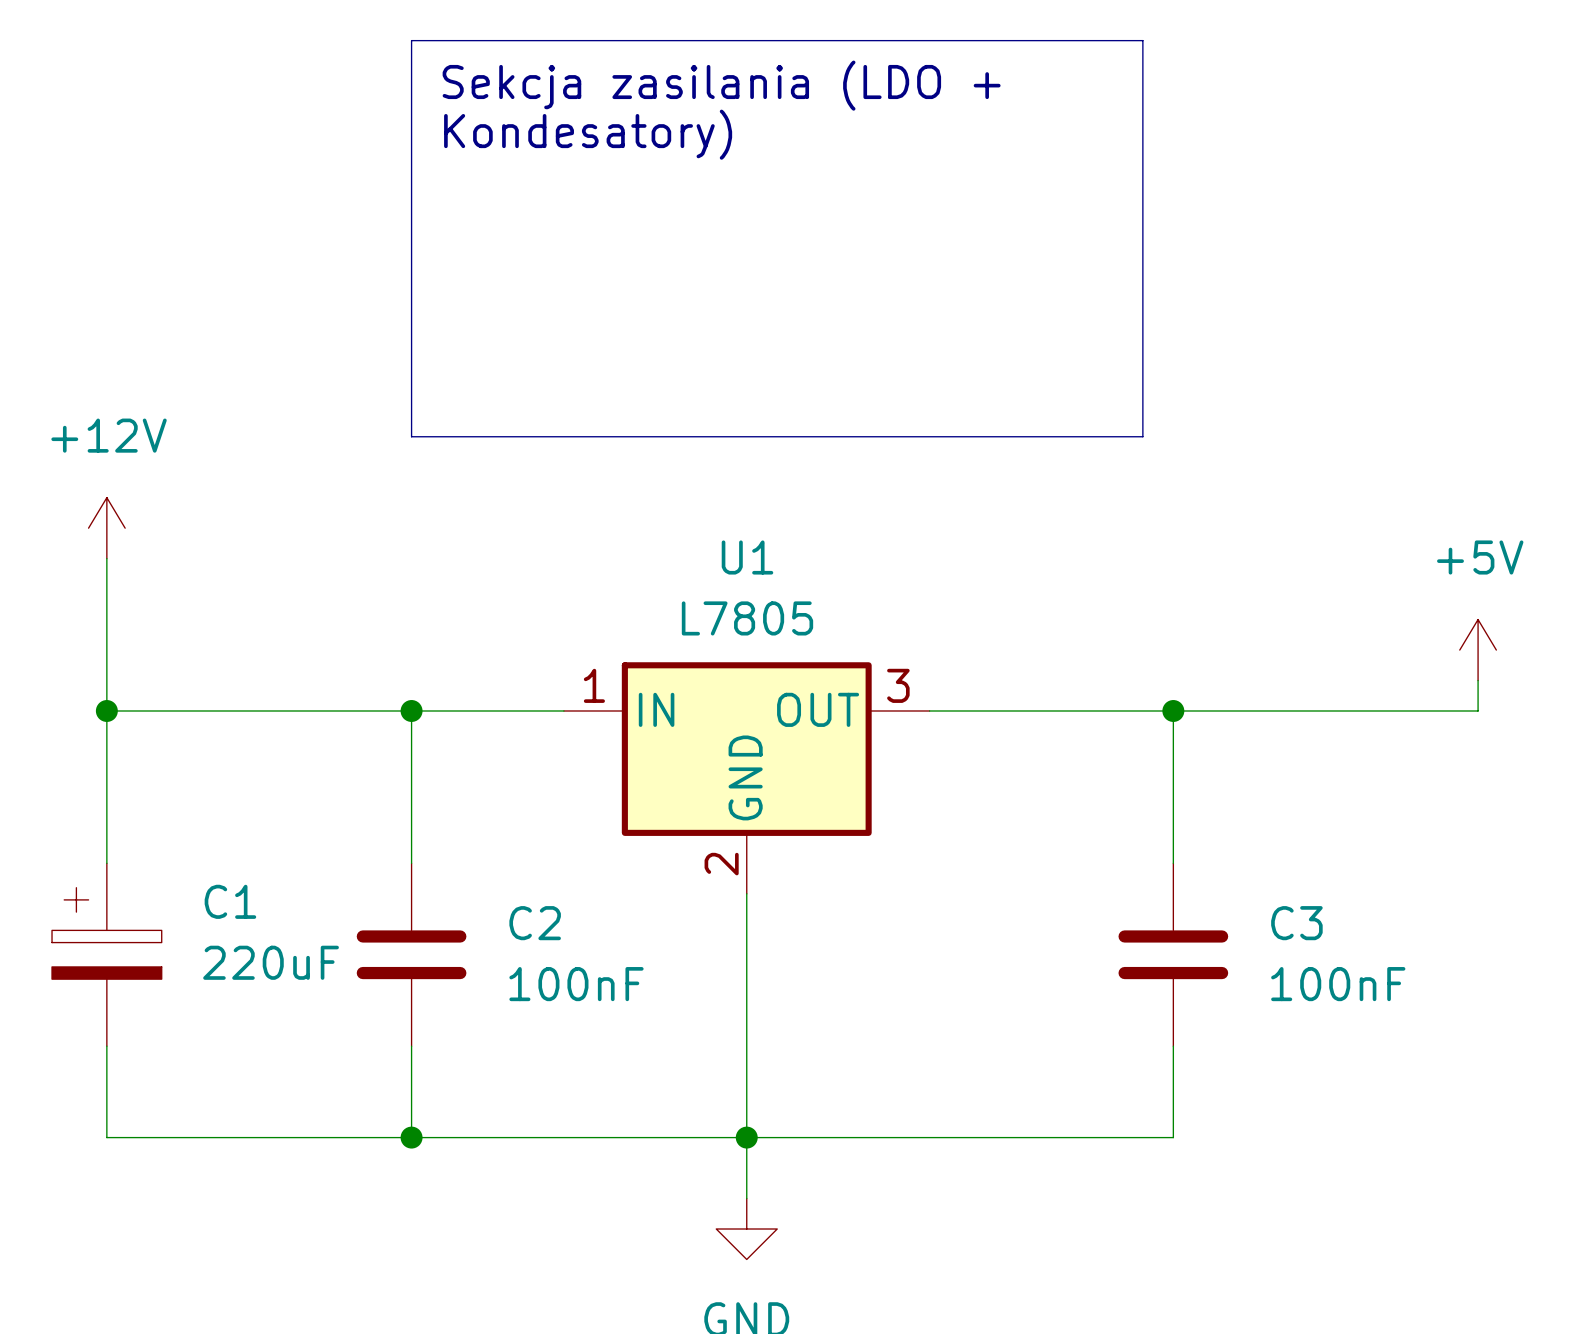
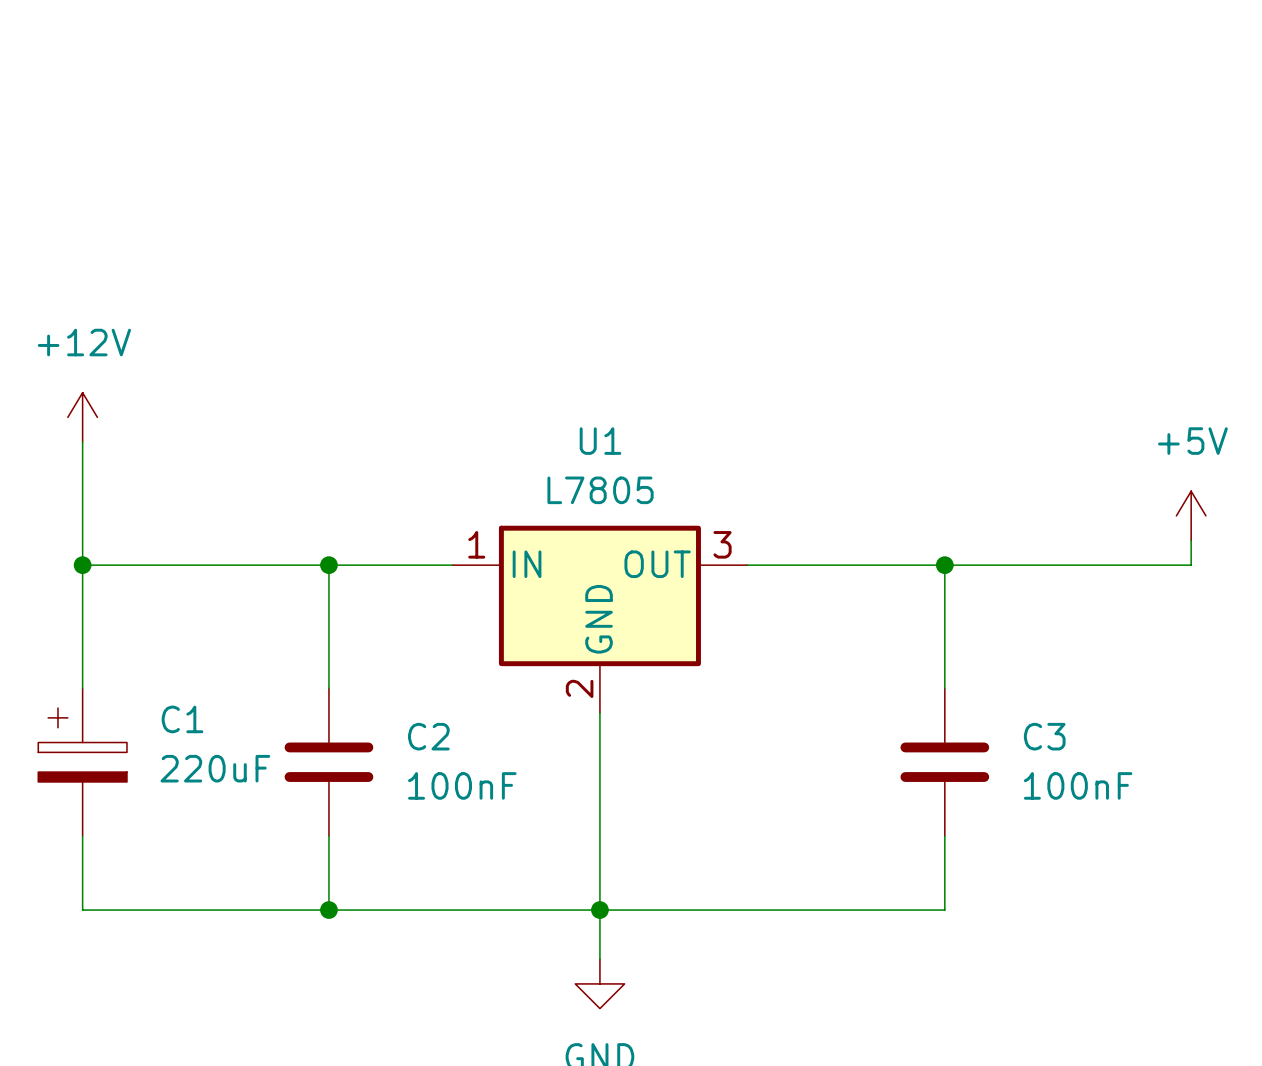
line: (411, 40) (1142, 40) (1142, 436) (411, 436) (411, 40) -> none
text: Sekcja zasilania (LDO + (721, 85) -> none
text: Kondesatory) (588, 134) -> none

